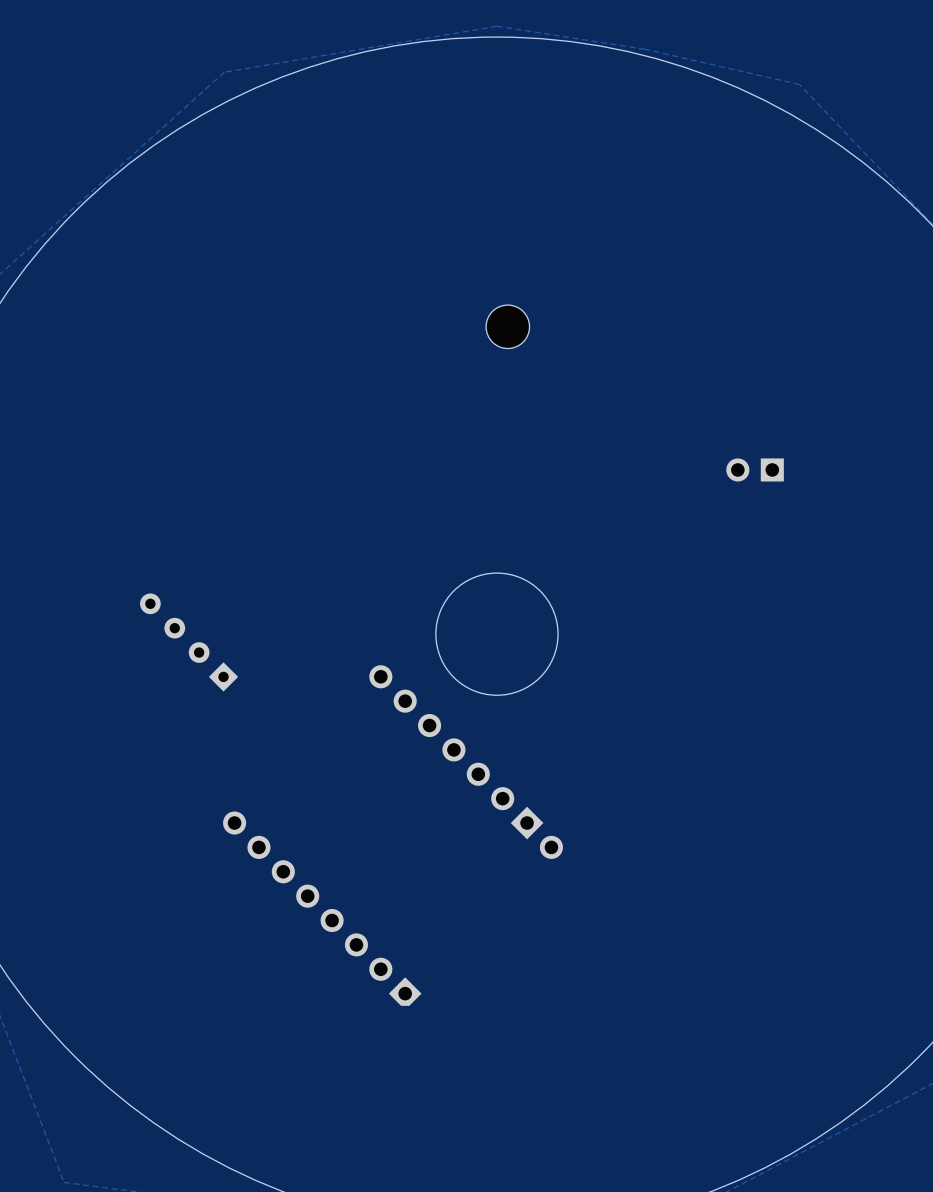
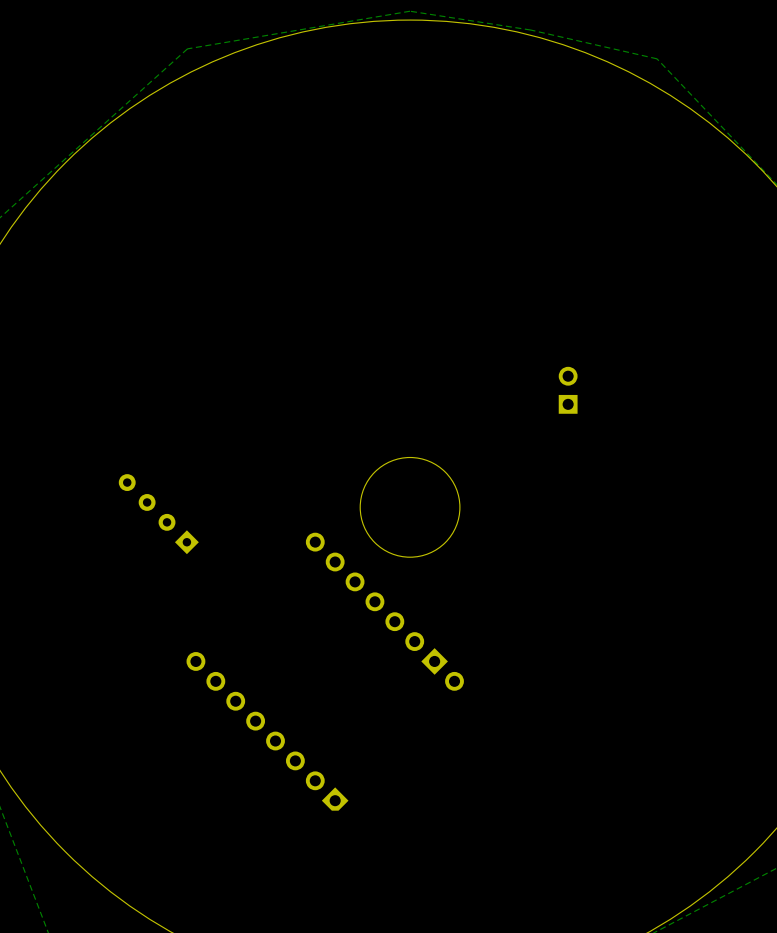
part: (507, 326) -> none
part rotation: 0° (755, 469) -> 90° clockwise (568, 390)
part position: (755, 469) -> (568, 390)

